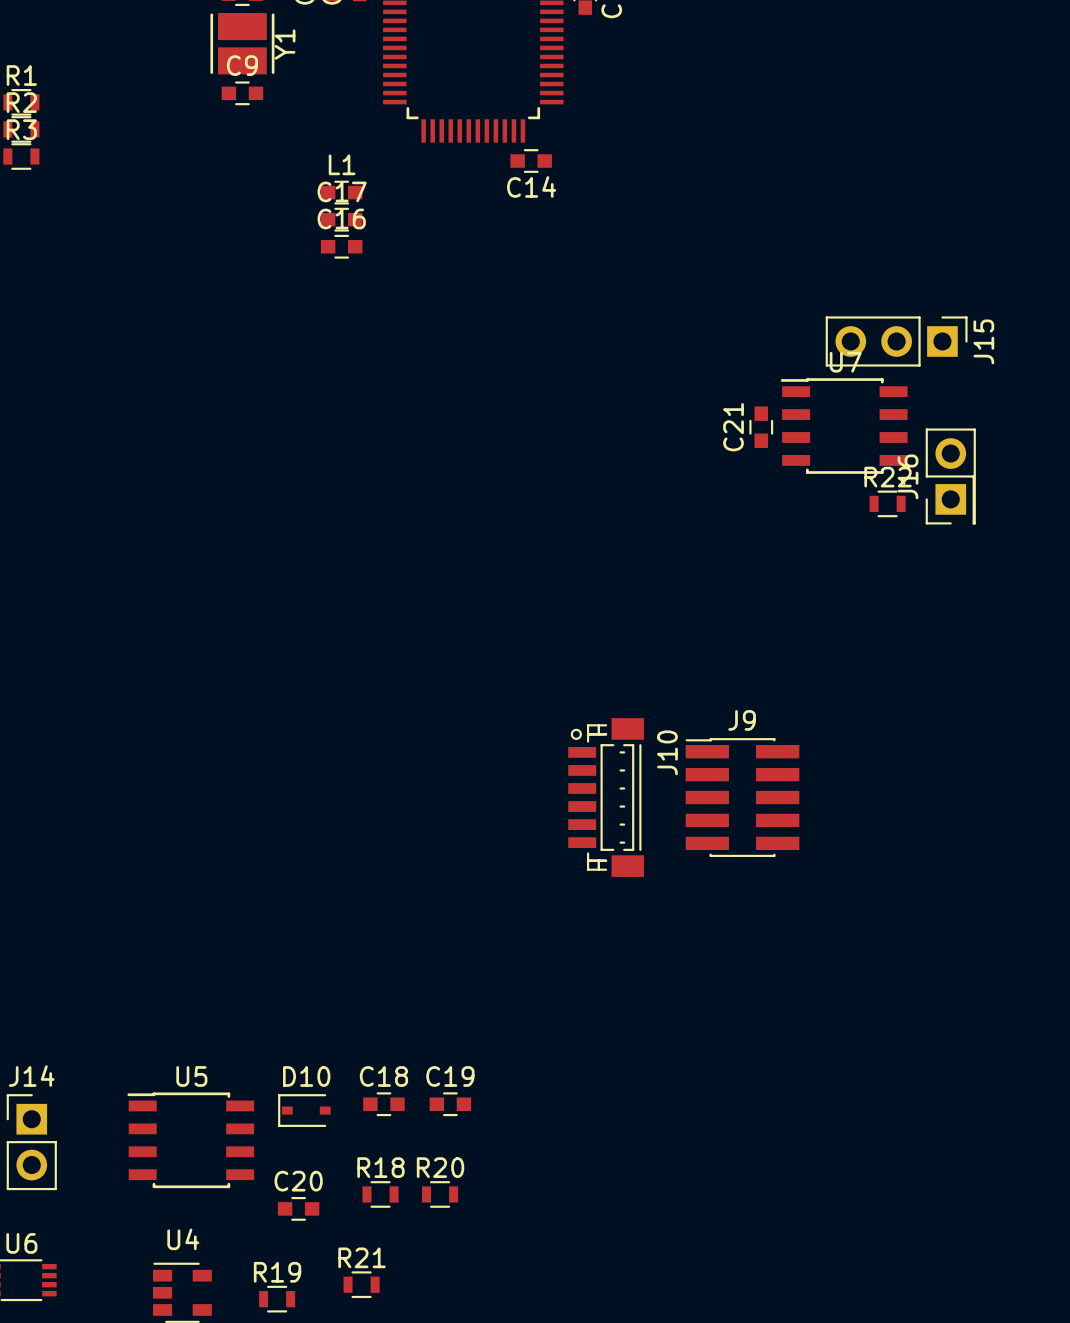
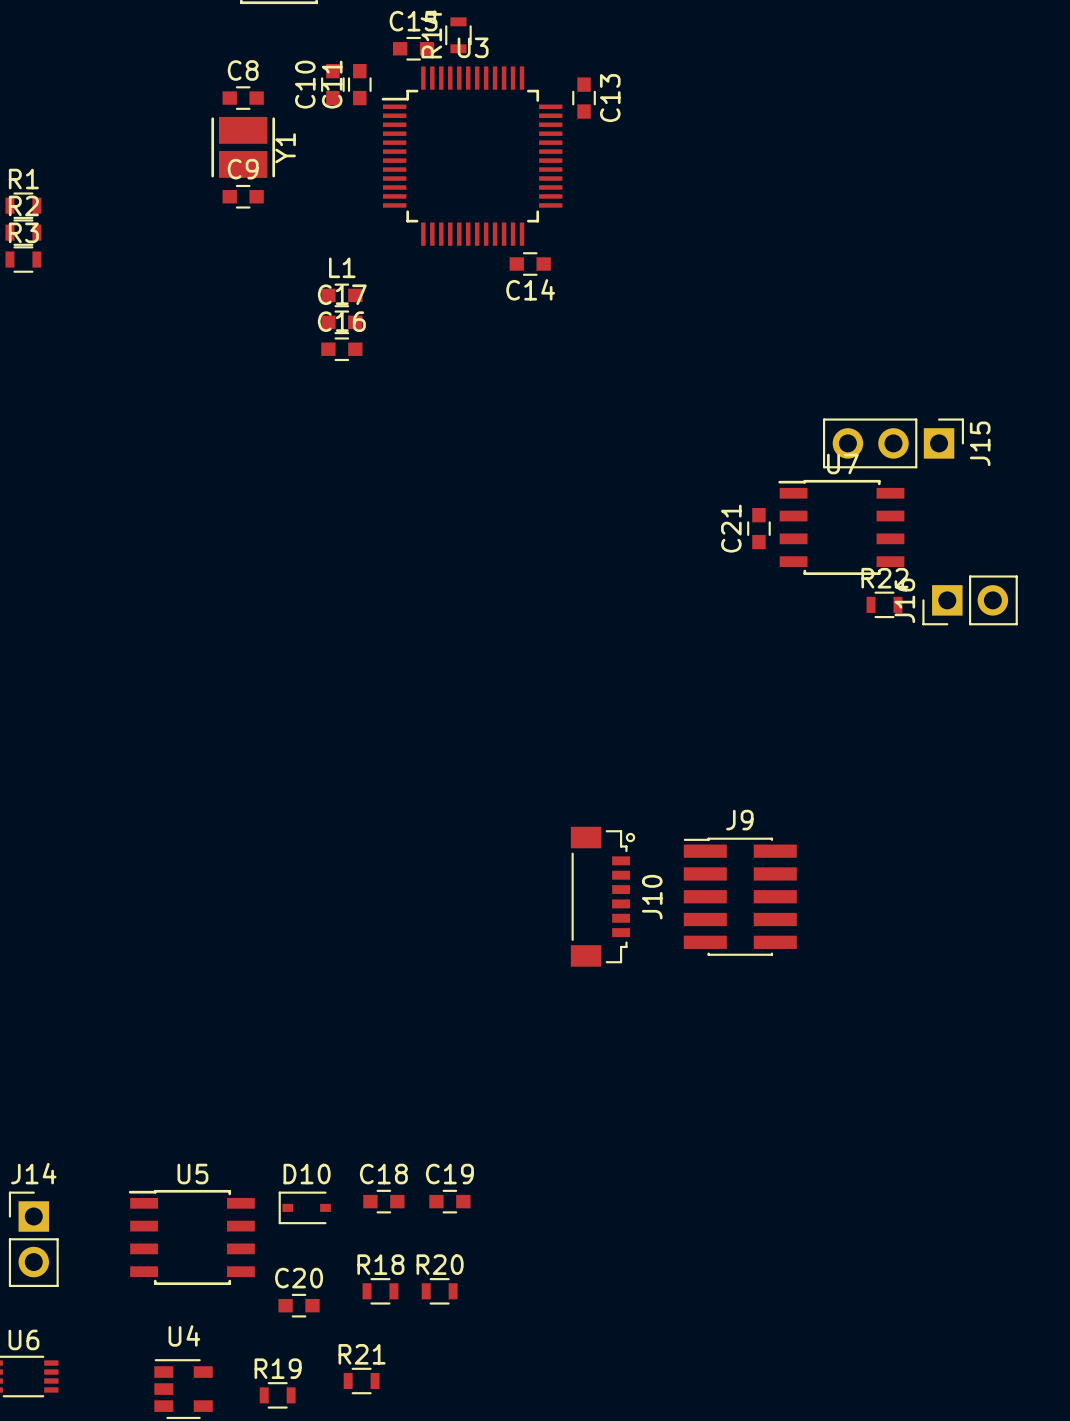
J16 footprint: [925, 428, 976, 525] -> [922, 575, 1018, 626]
J10 footprint: [568, 718, 645, 877] -> [570, 826, 636, 967]
J10 name position: J10 (667, 752) -> J10 (652, 897)

